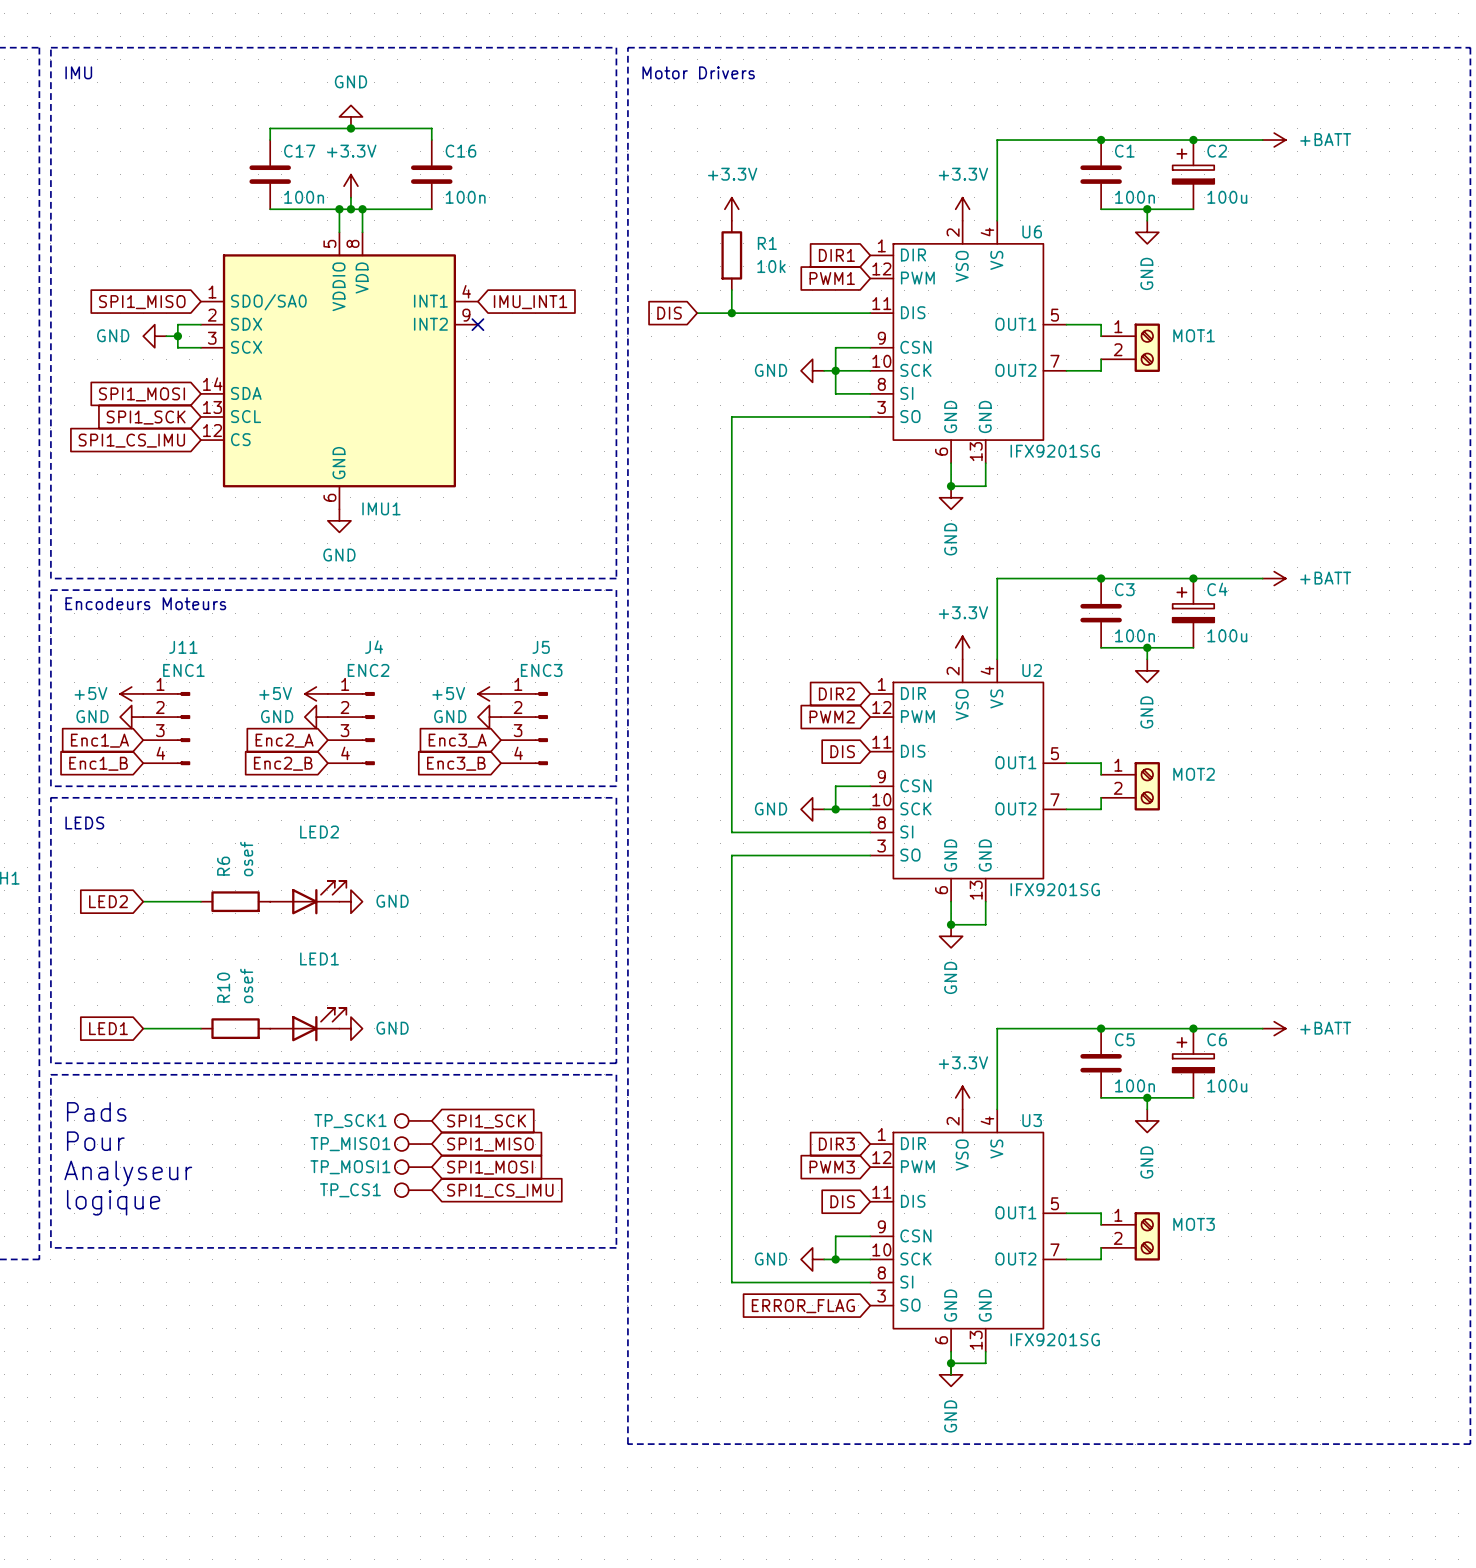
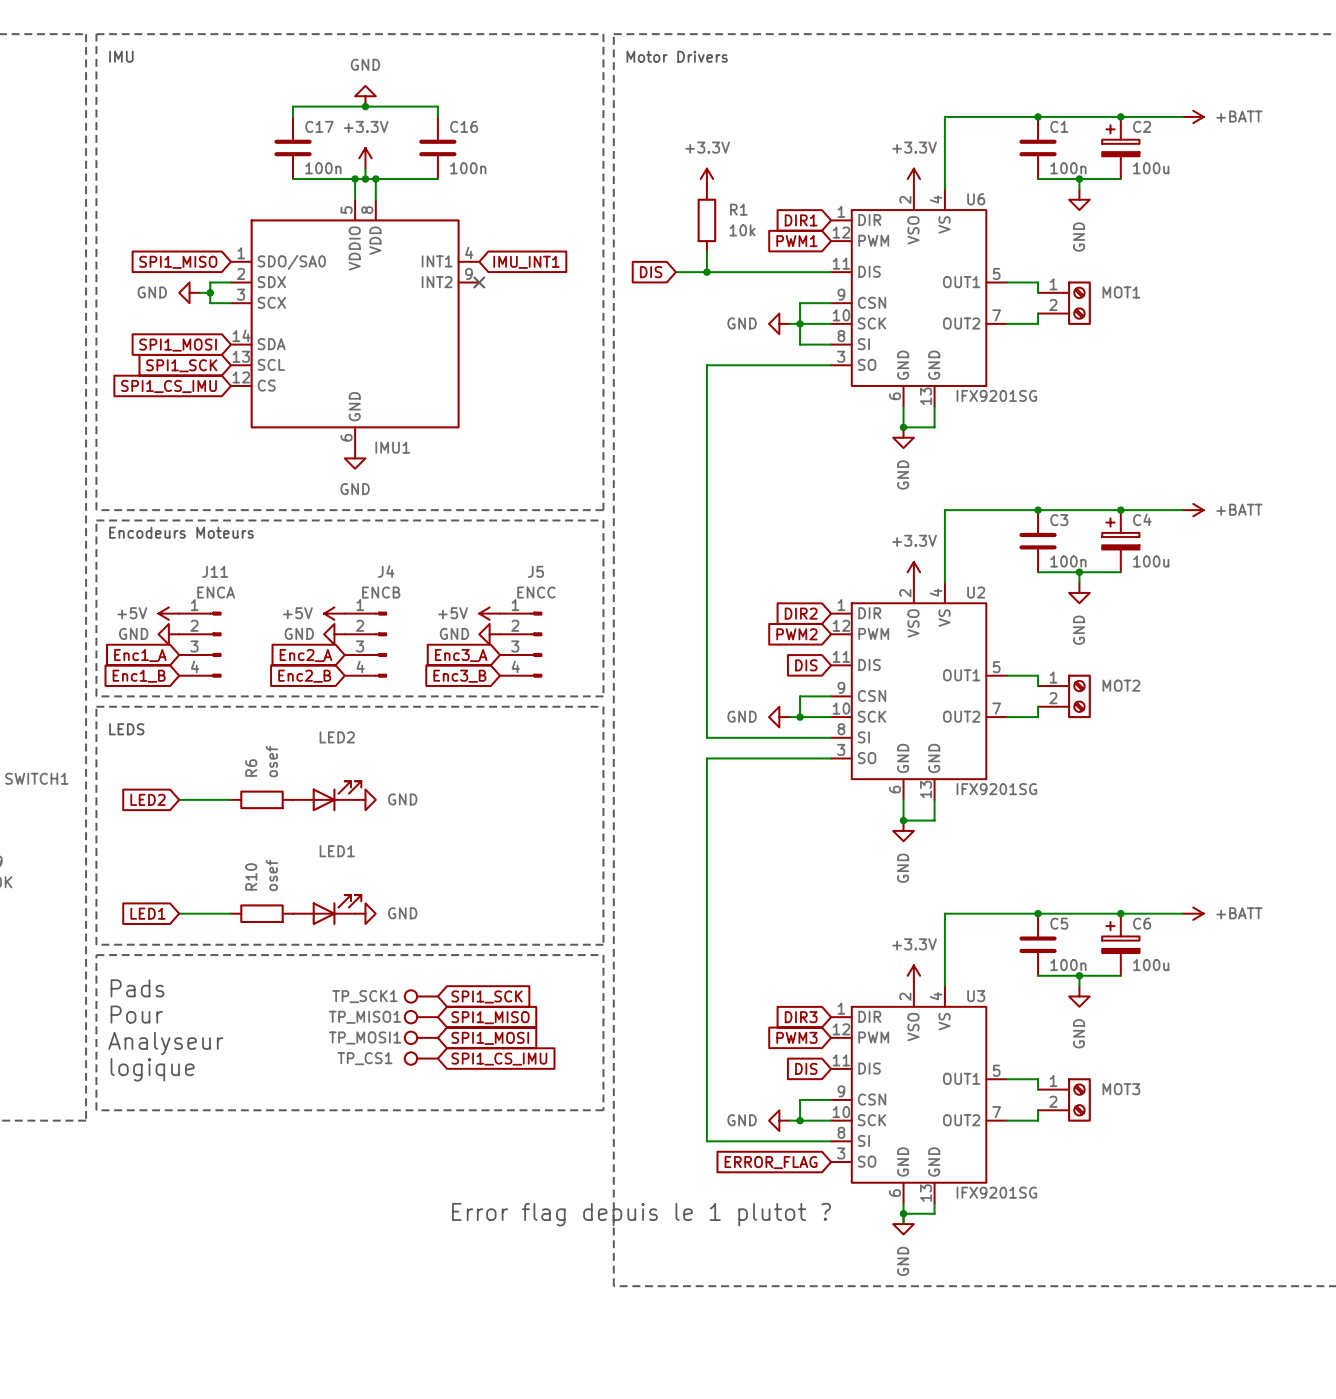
J11 value: ENC1 (183, 670) -> ENCA (216, 592)
J4 value: ENC2 (368, 670) -> ENCB (381, 592)
J5 value: ENC3 (541, 670) -> ENCC (536, 592)
text: none -> Error flag depuis le 1 plutot ? (641, 1214)

